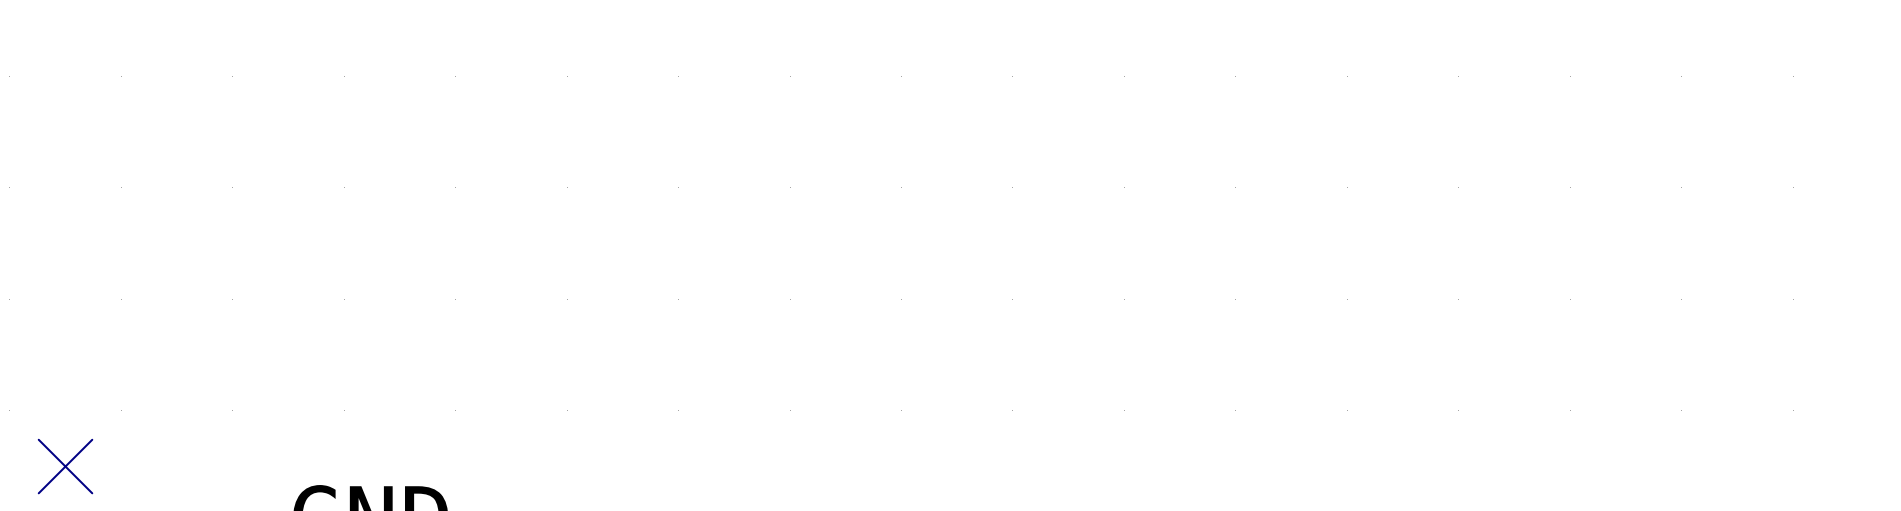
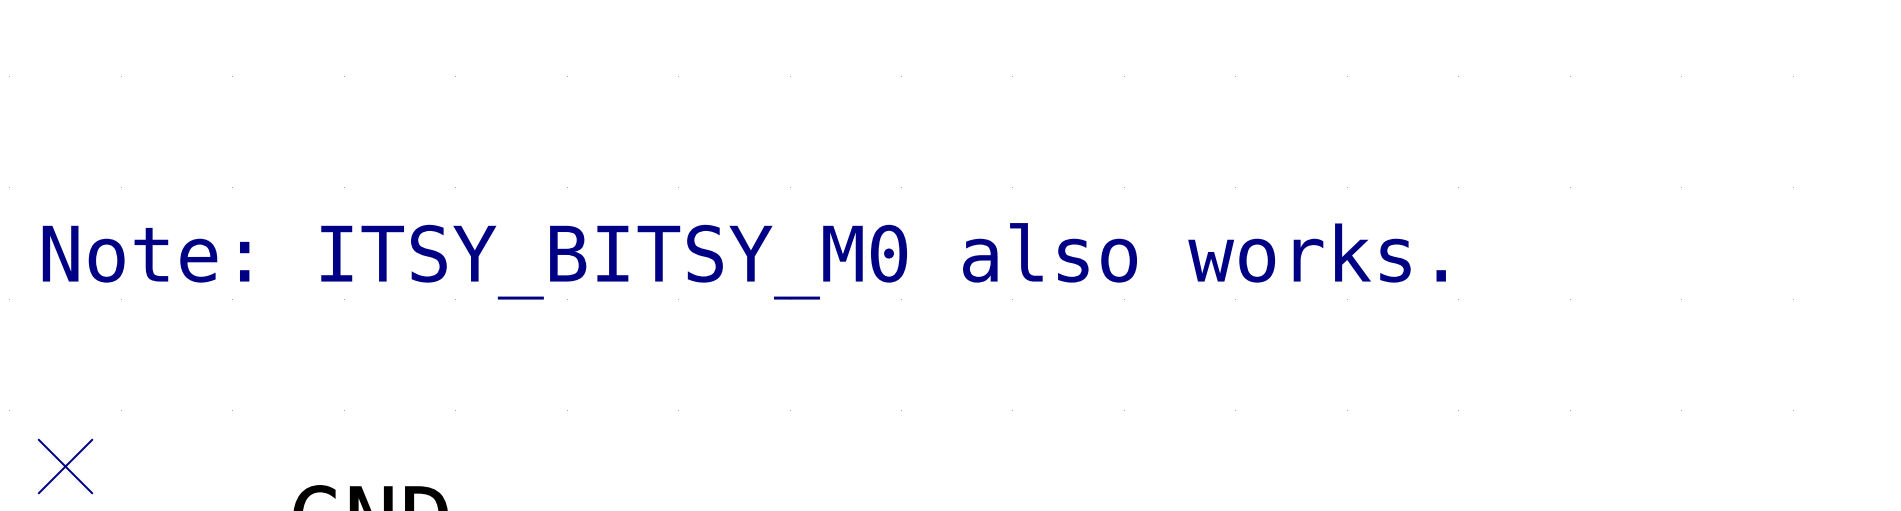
text: none -> Note: ITSY_BITSY_M0 also works. (744, 261)

